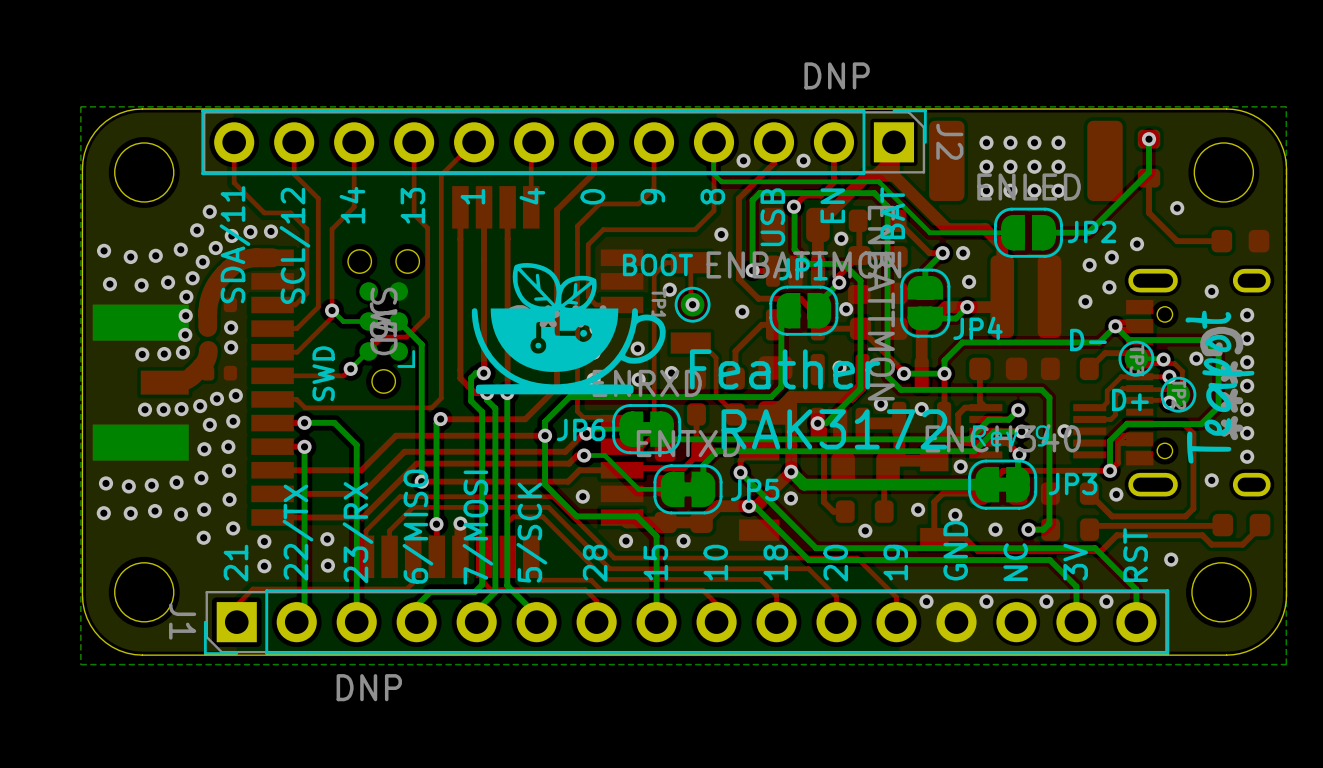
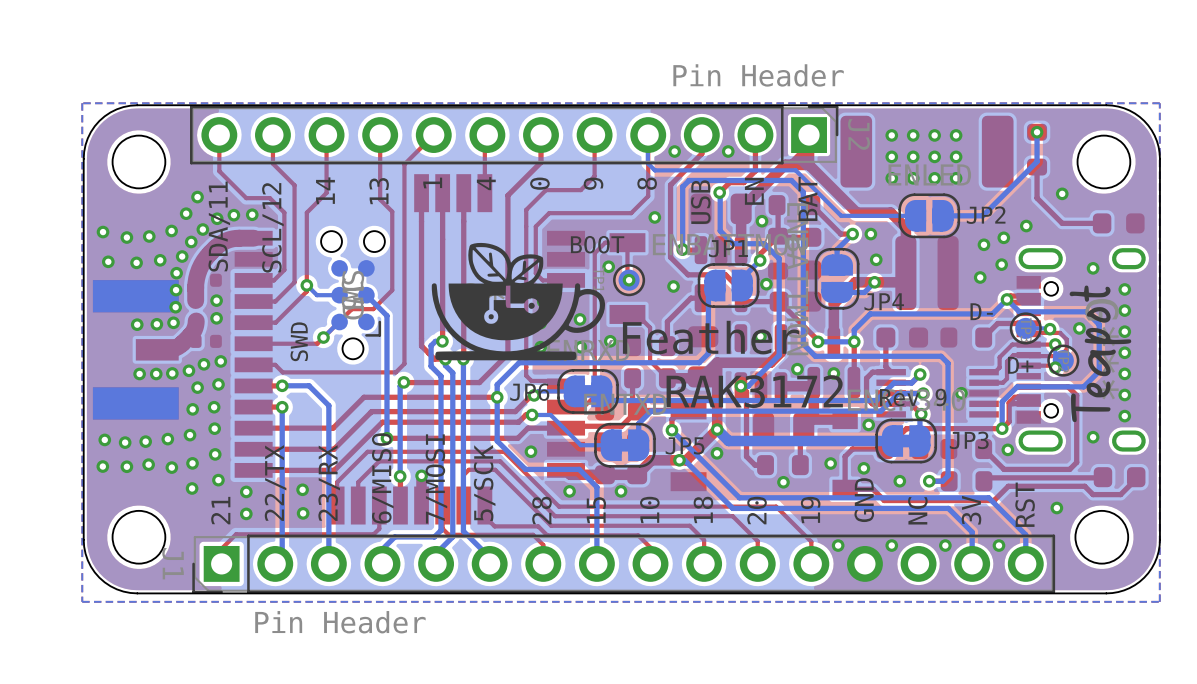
J2 value: DNP (837, 75) -> Pin Header (758, 75)
J1 value: DNP (369, 687) -> Pin Header (340, 622)

